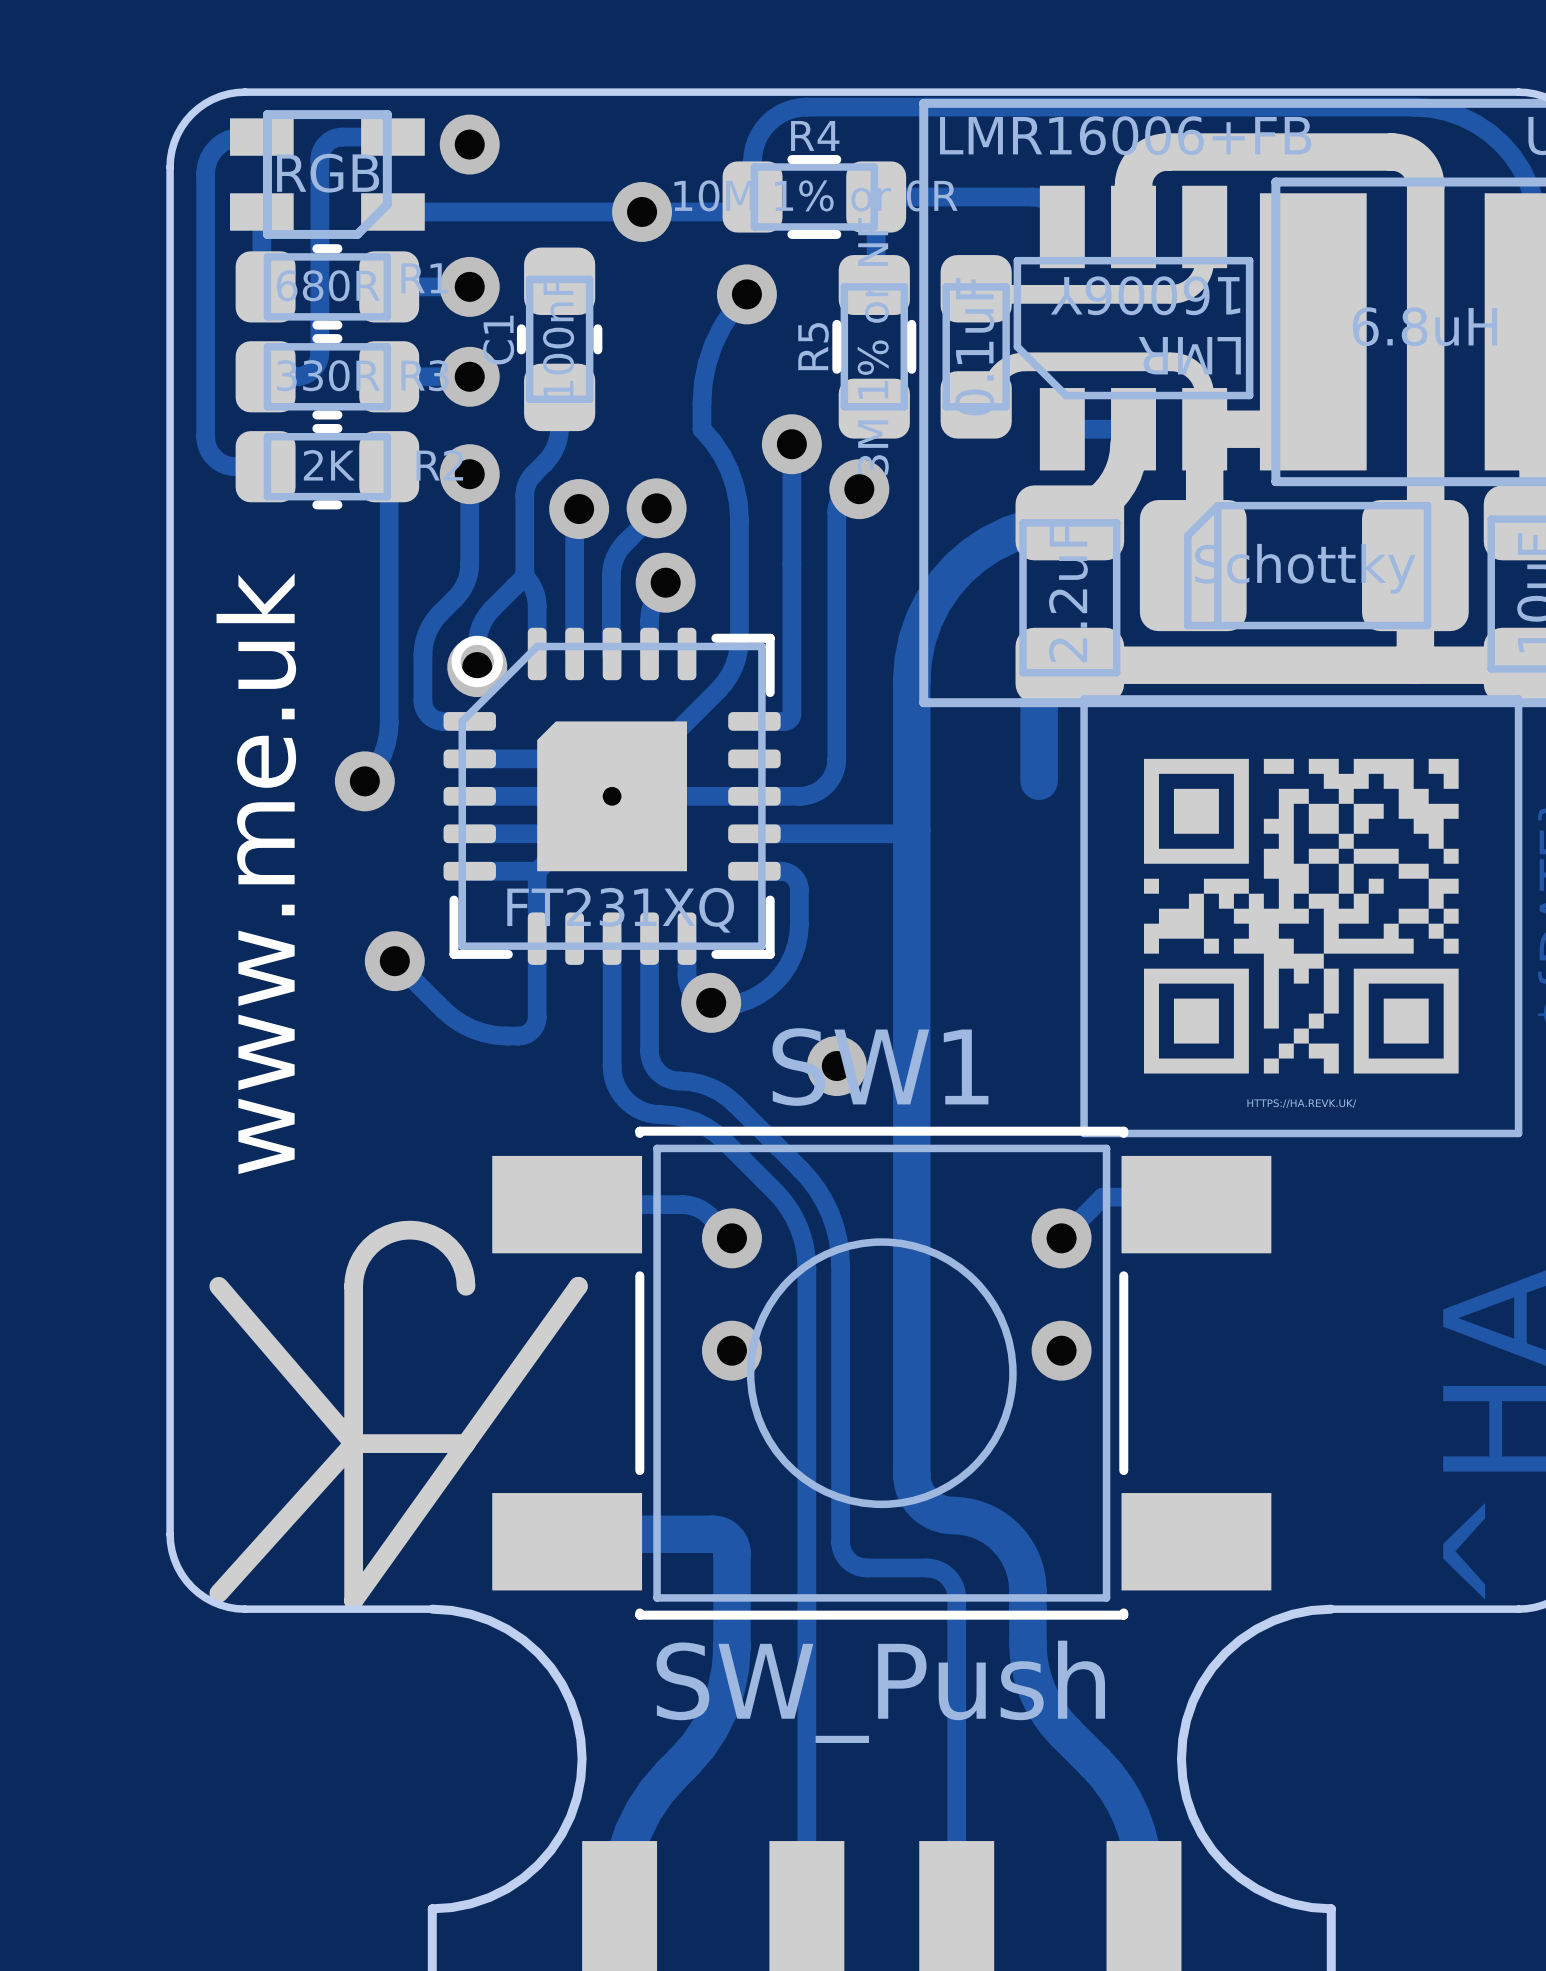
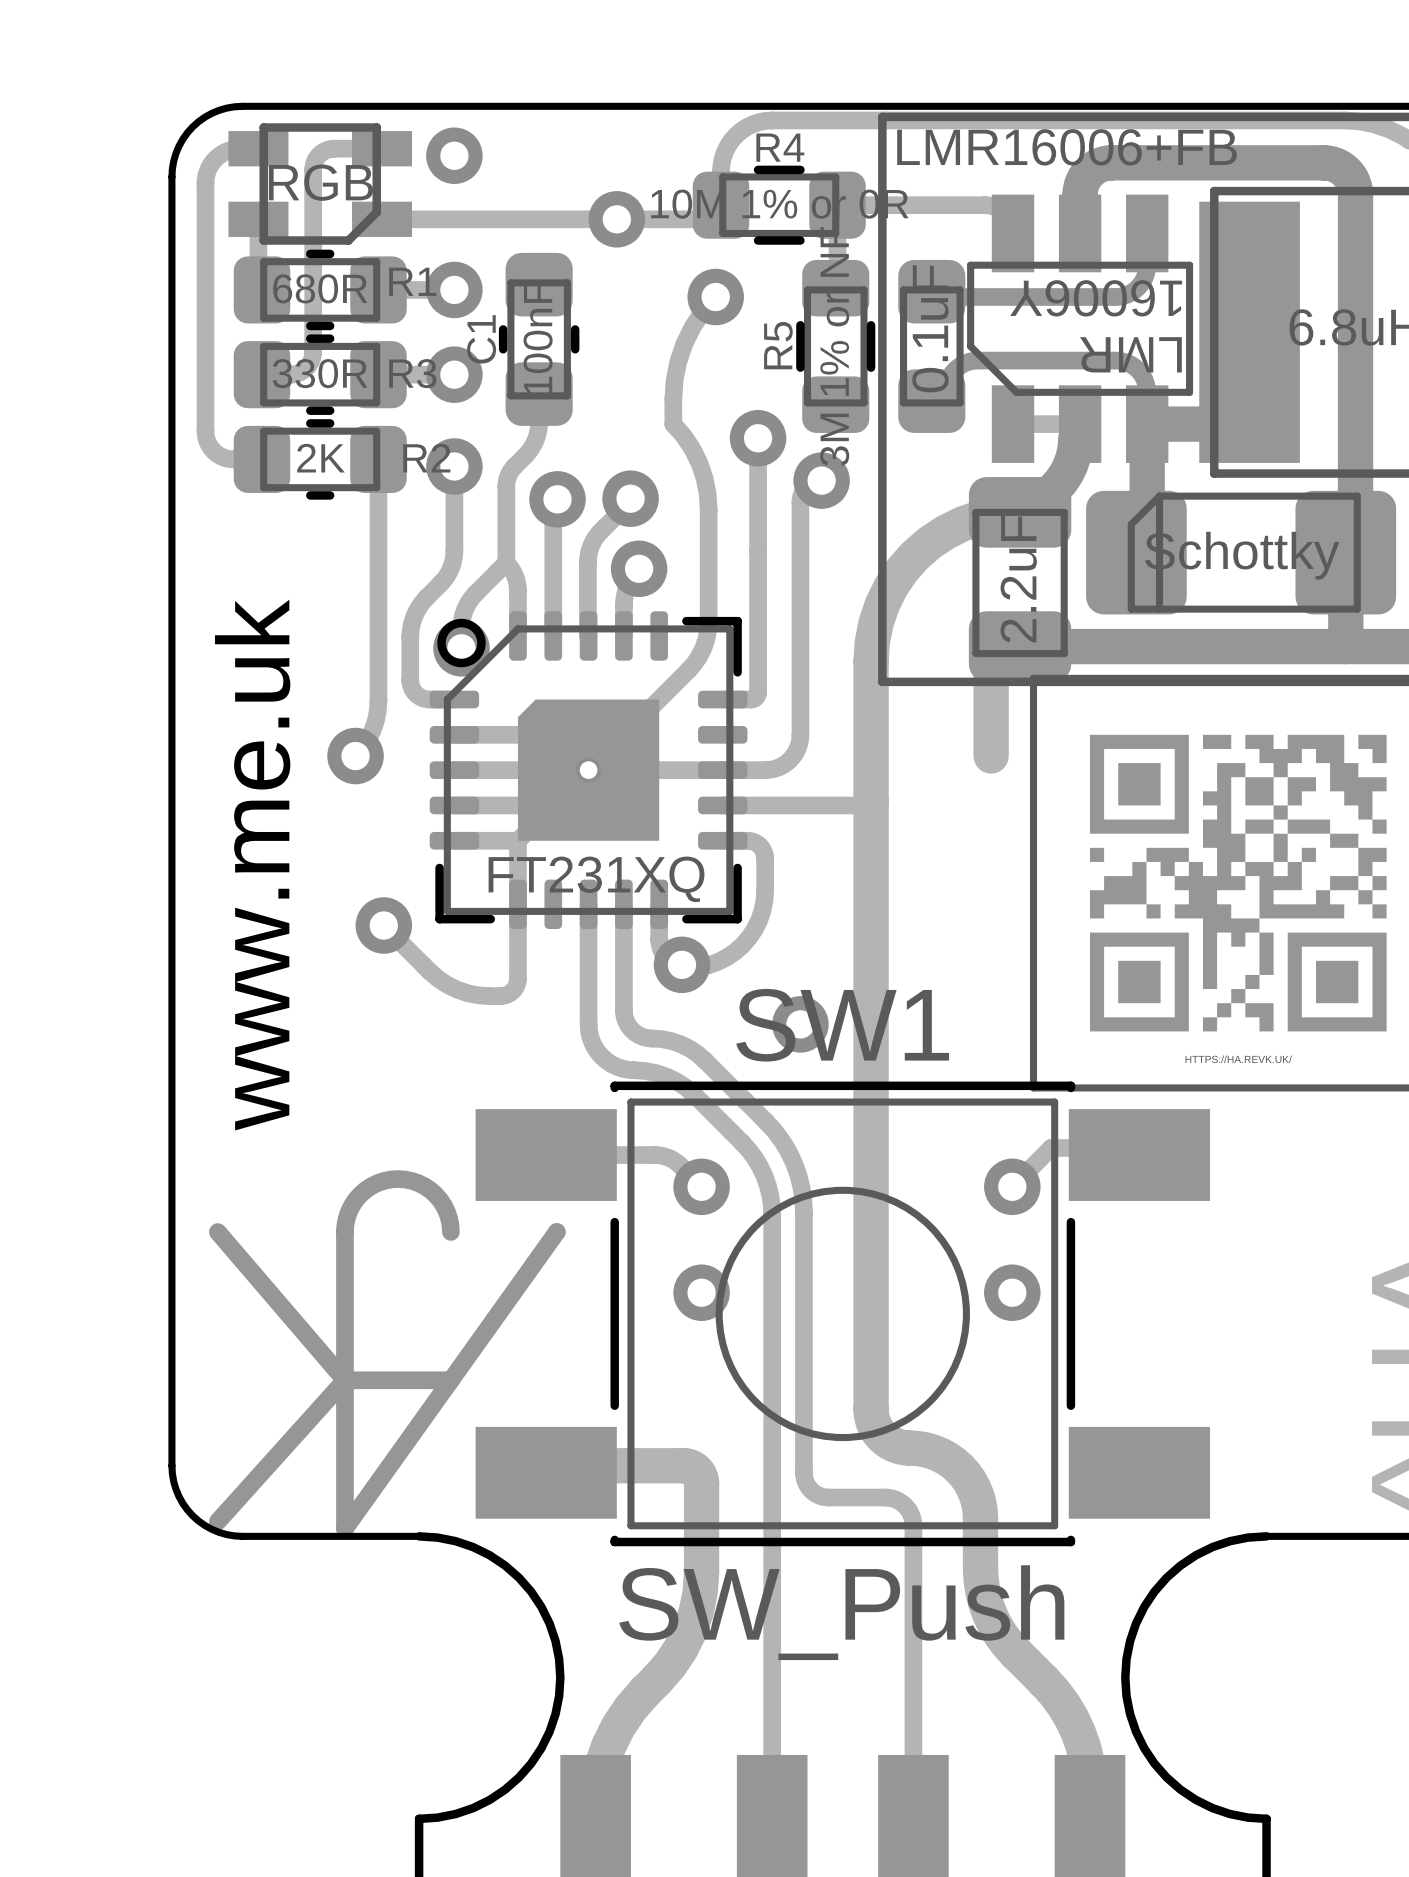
drawing position: (974, 346) -> (930, 328)

